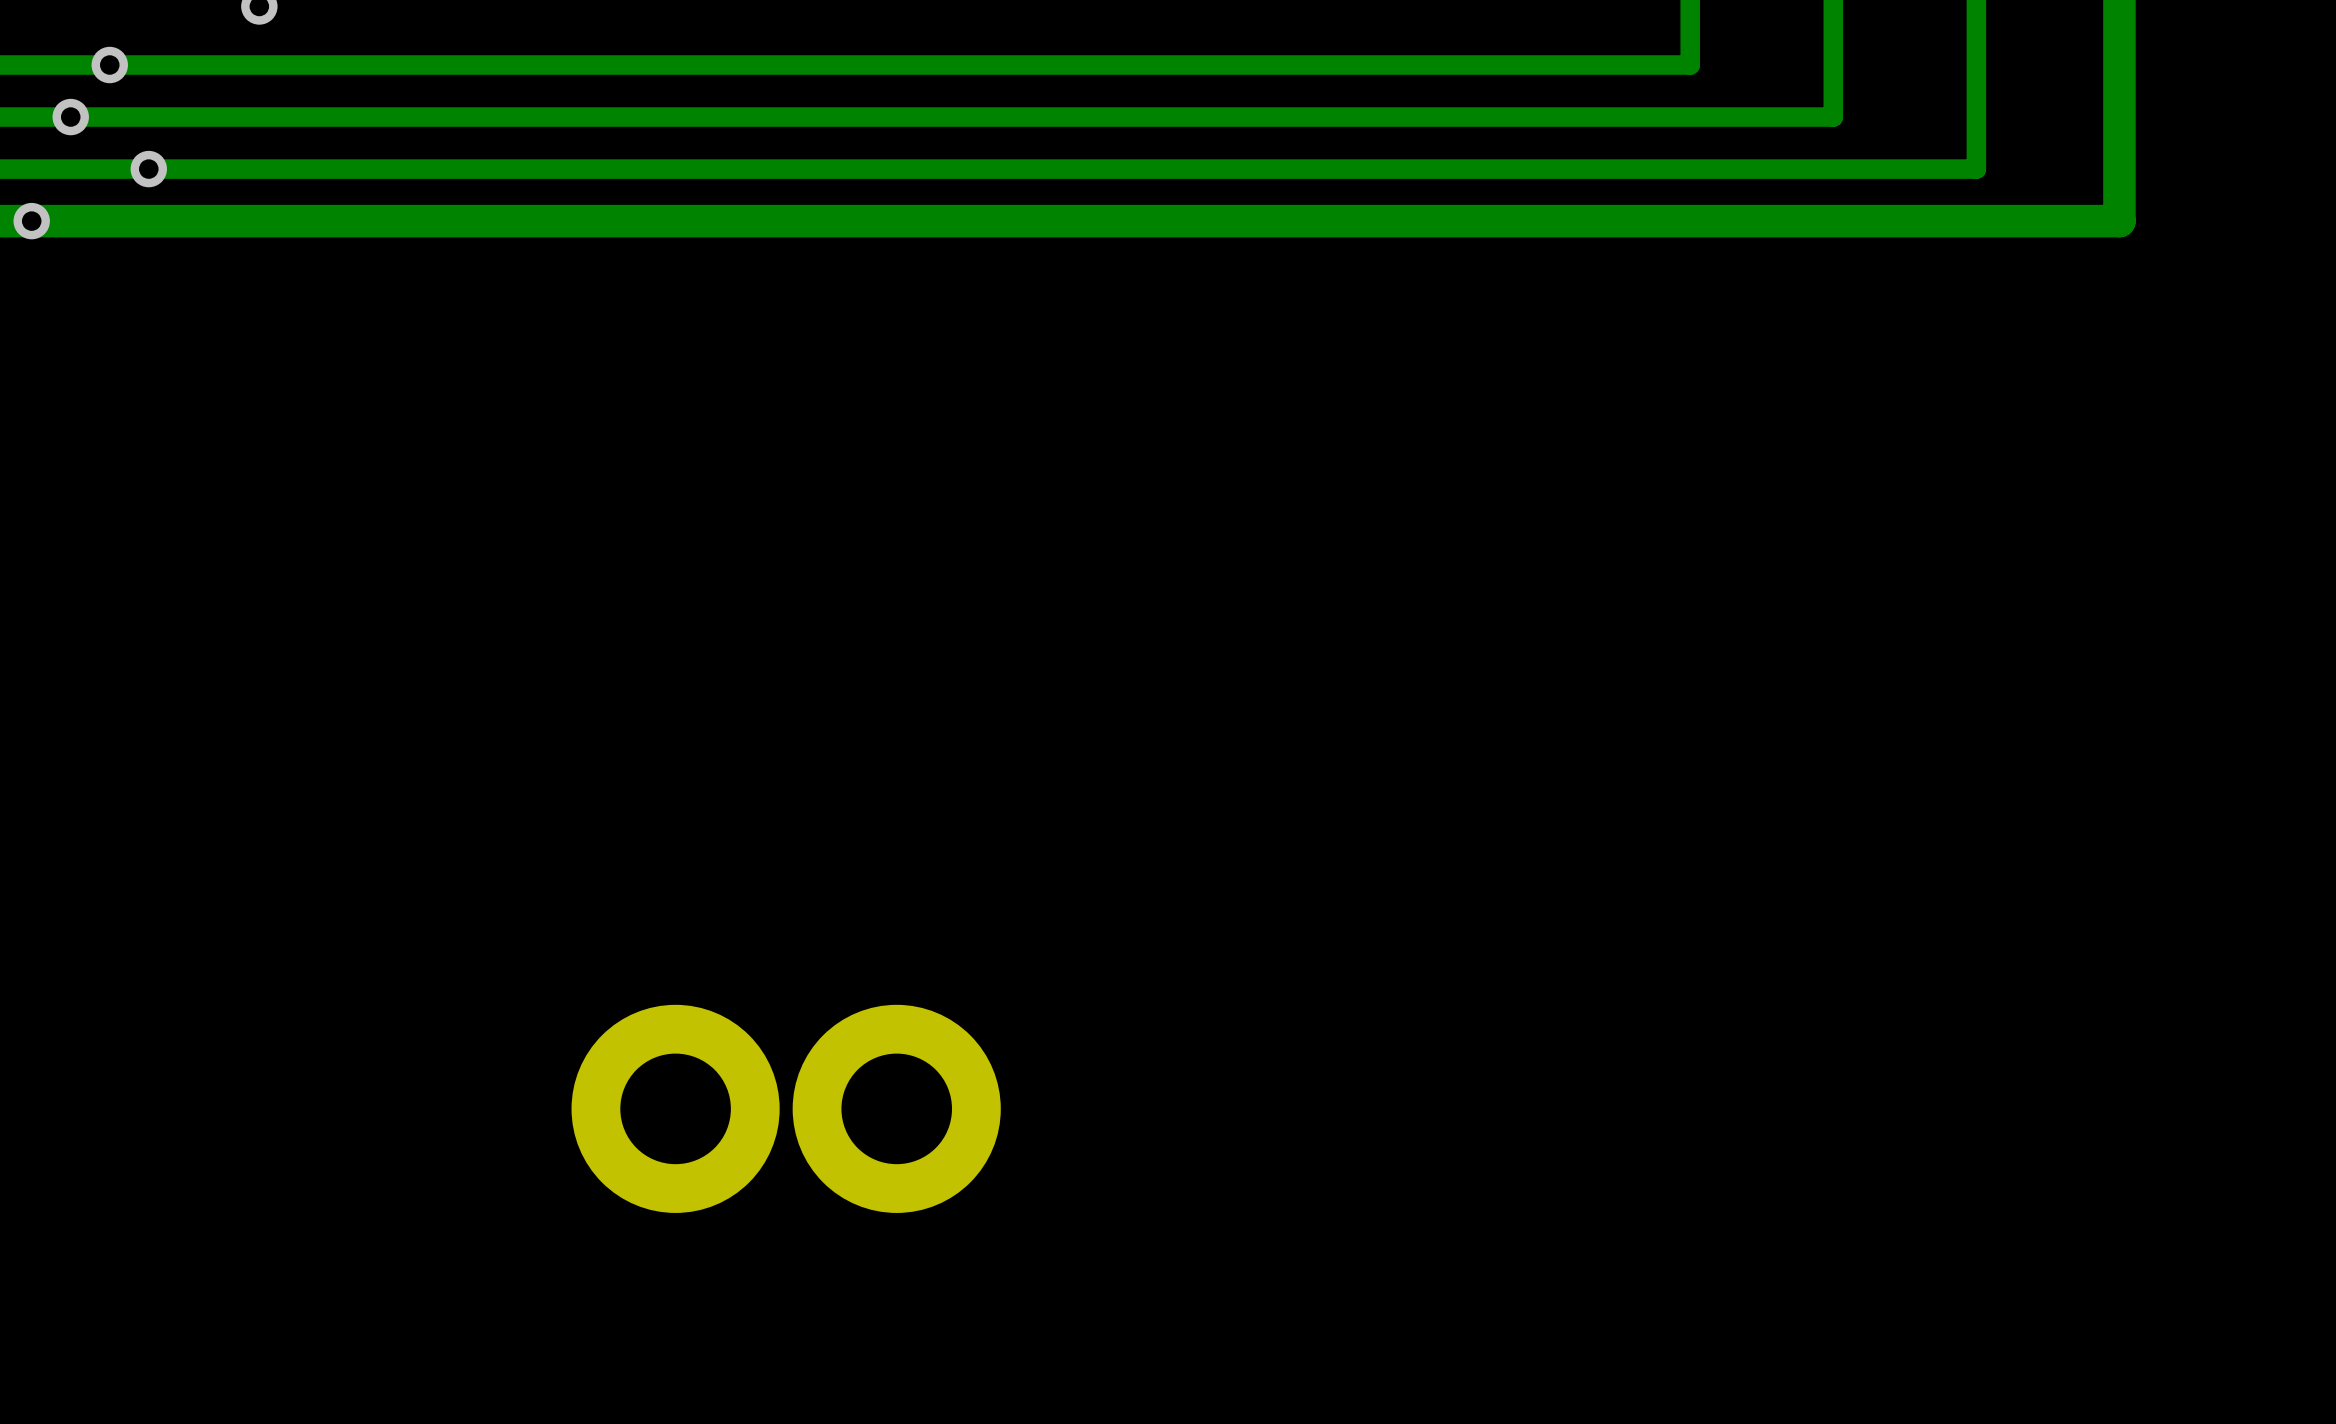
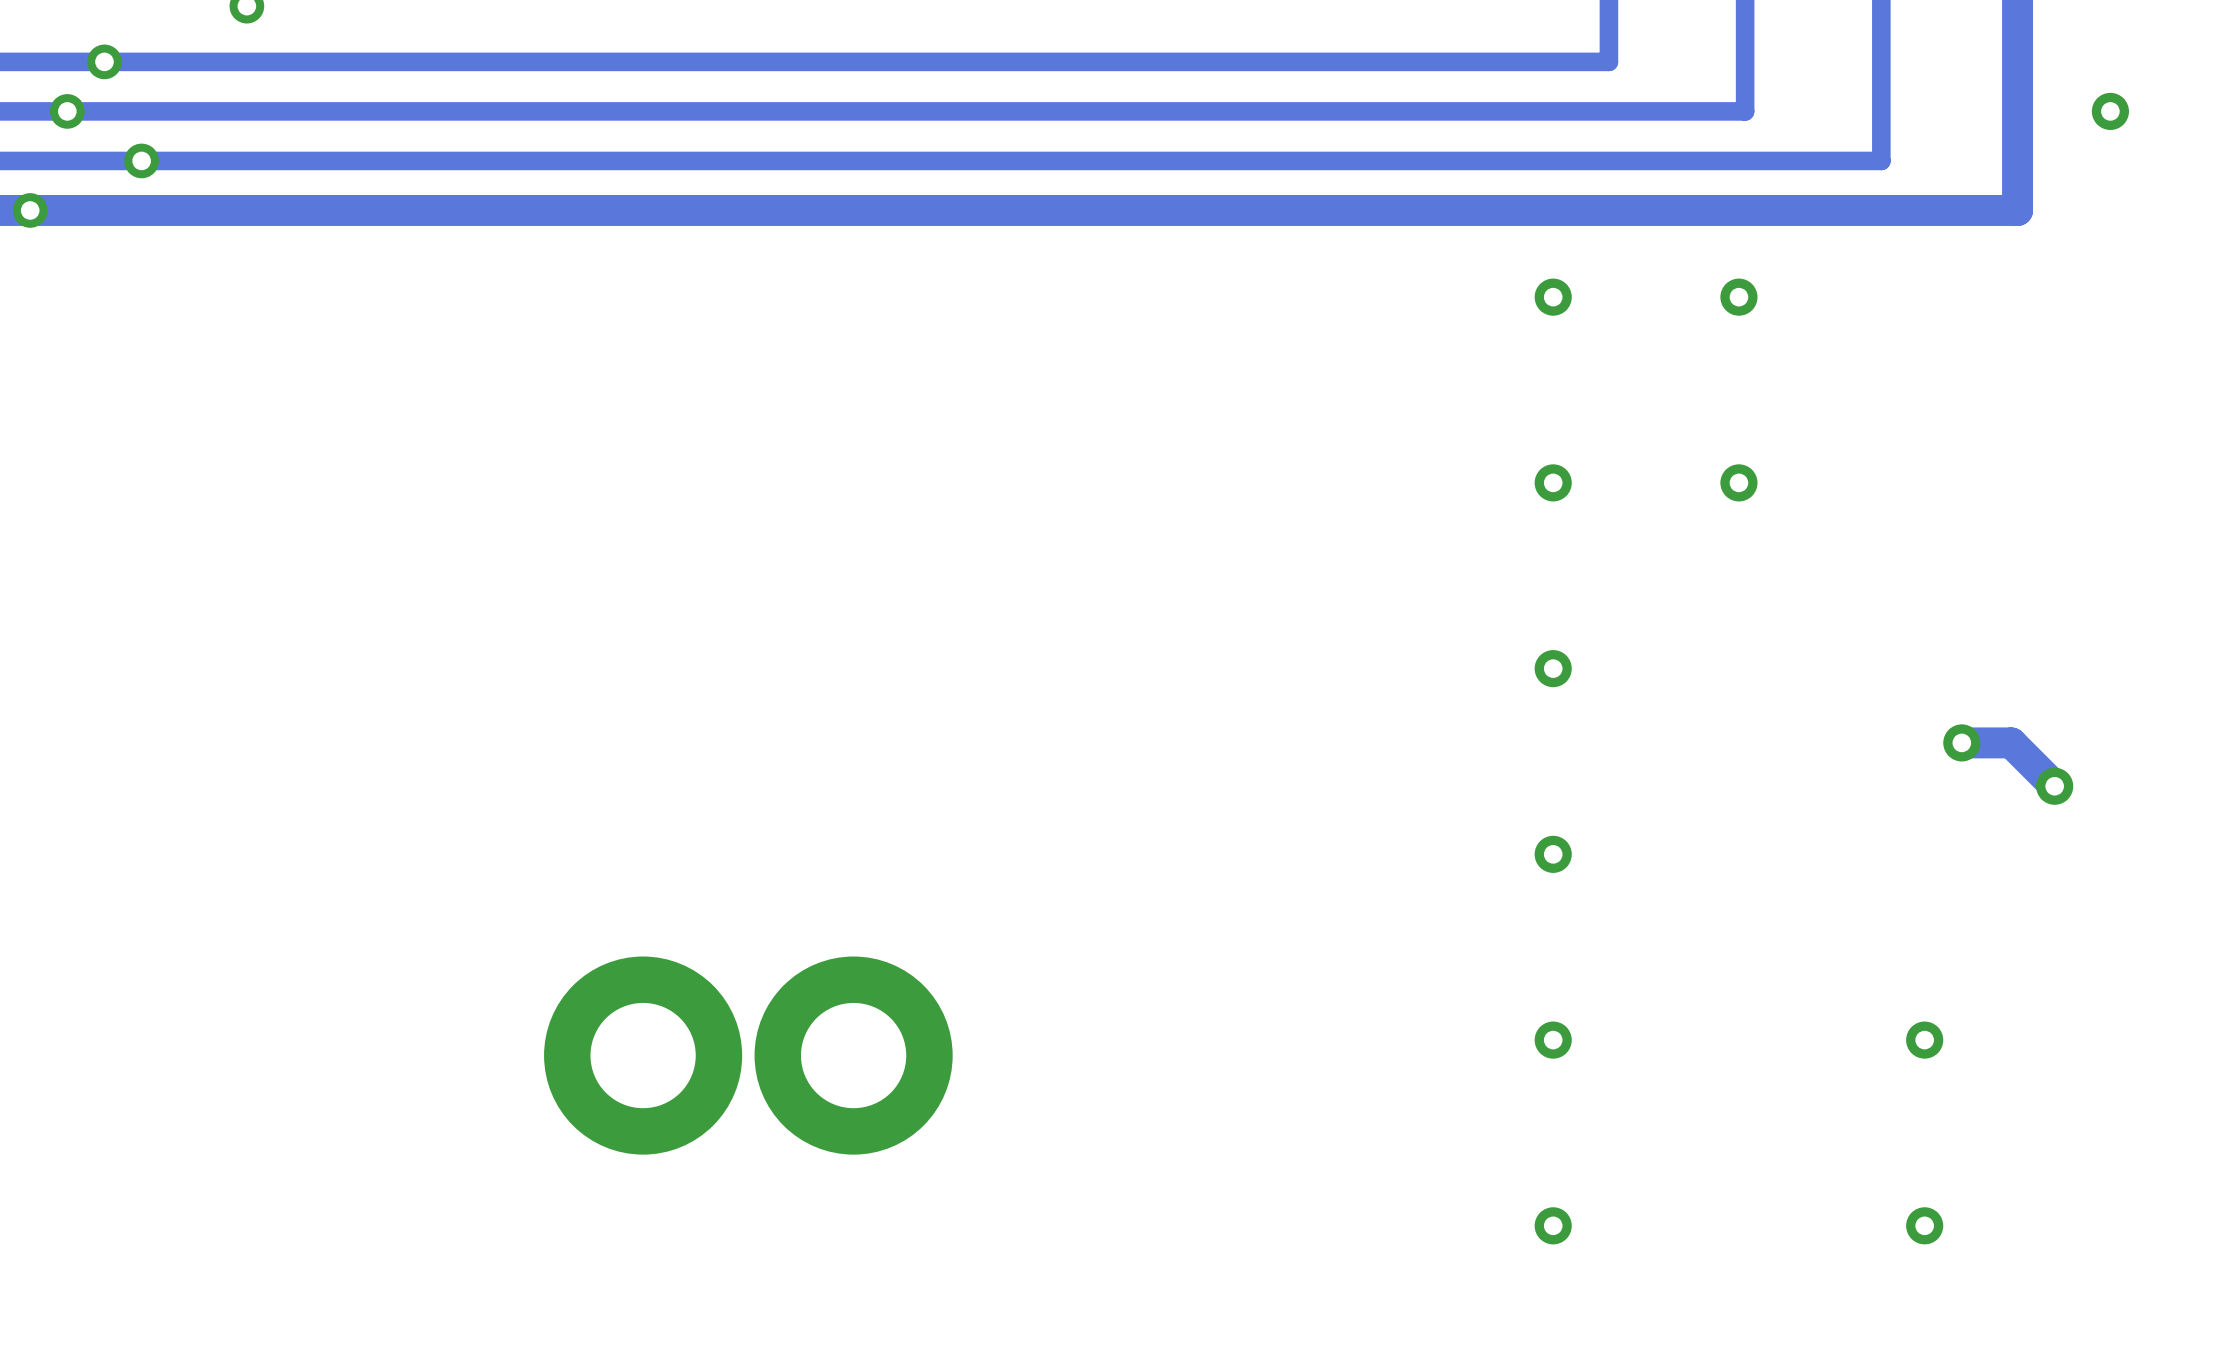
via: none -> (2110, 111)
via: none -> (1553, 297)
via: none -> (1738, 297)
via: none -> (1553, 482)
via: none -> (1738, 482)
via: none -> (1553, 668)
track: none -> (1961, 742) (2011, 742) (2054, 786)
via: none -> (1961, 742)
via: none -> (2054, 786)
via: none -> (1553, 854)
via: none -> (1553, 1040)
via: none -> (1924, 1040)
via: none -> (1553, 1225)
via: none -> (1924, 1225)

